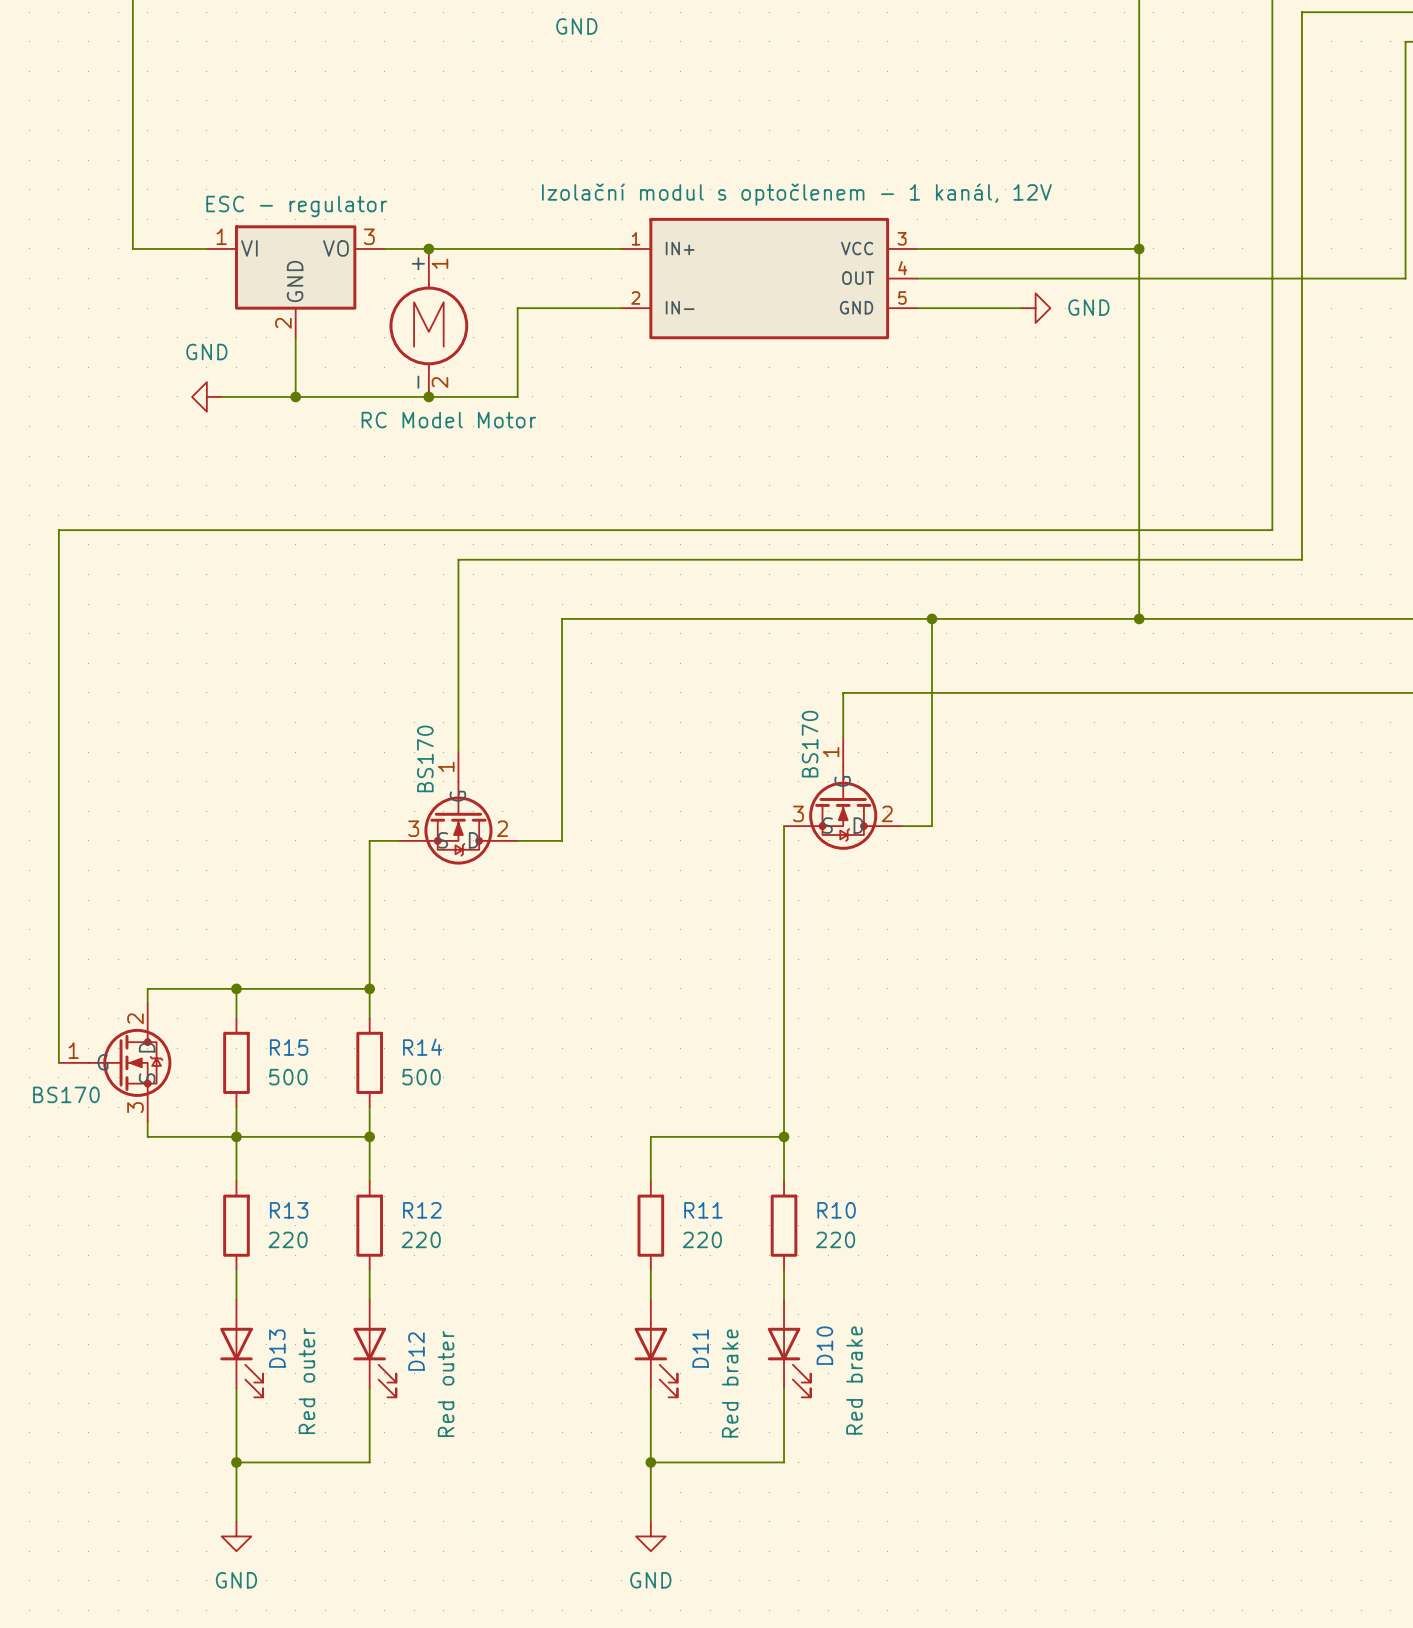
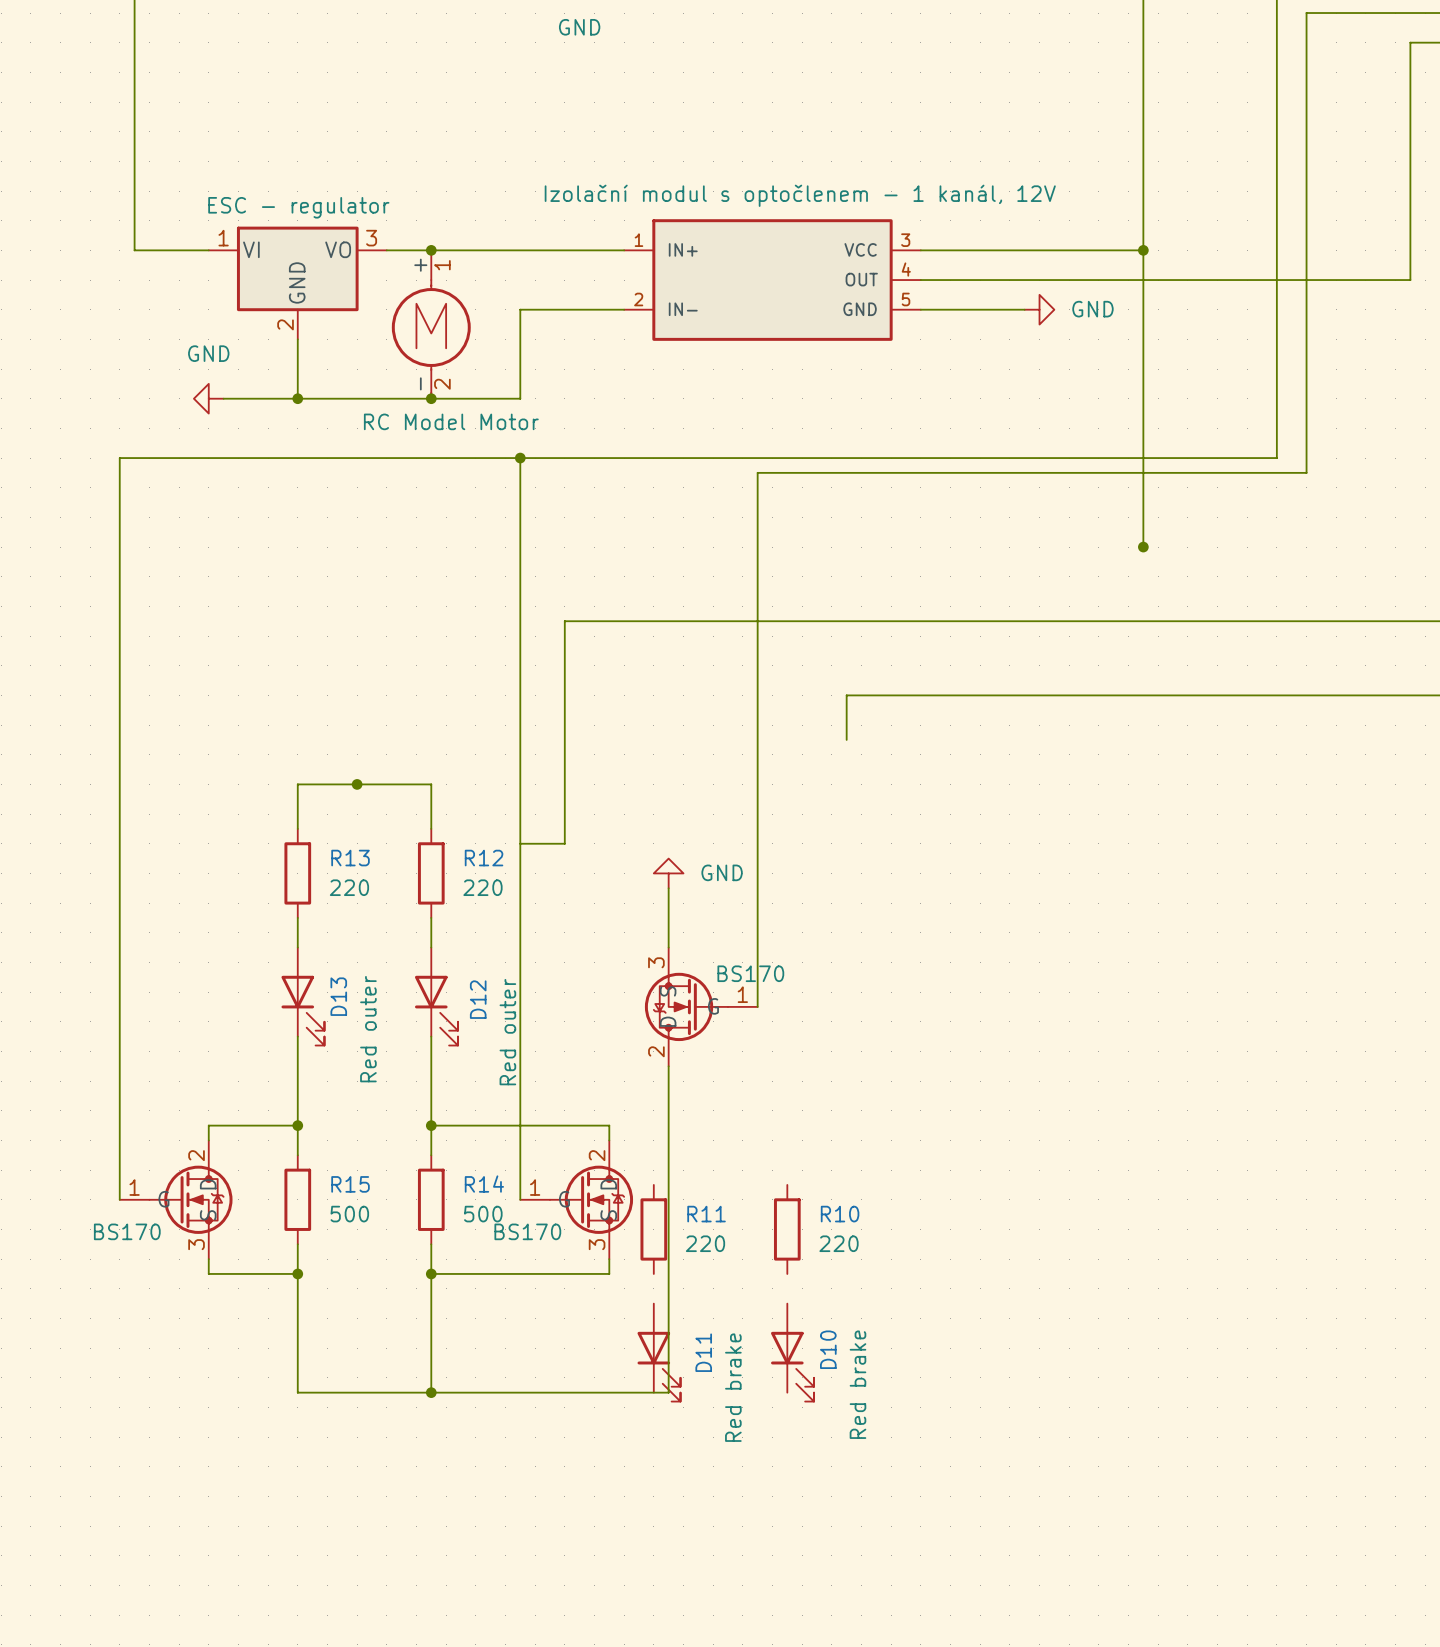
wire: none -> (520, 458) (520, 1199)
junction: none -> (520, 458)
wire: (1272, 456) (1272, 530) (58, 530) (58, 1062) -> (1276, 458) (119, 458) (119, 1199)
wire: (1301, 470) (1301, 559) (458, 559) (458, 752) -> (1306, 472) (757, 472) (757, 1006)
wire: (1139, 544) (1139, 618) -> none
junction: none -> (1143, 547)
wire: (932, 618) (932, 826) (902, 826) -> none
junction: (932, 618) -> none
junction: (1139, 618) -> none
junction: none -> (357, 784)
part: BS170 (843, 793) -> none
part: BS170 (458, 808) -> none
wire: none -> (297, 828) (297, 784) (431, 784) (431, 828)
wire: (784, 826) (784, 1181) -> none
wire: (399, 840) (369, 840) (369, 1018) -> none
power symbol: none -> GND (668, 873)
wire: none -> (668, 888) (668, 947)
wire: none -> (431, 917) (431, 947)
wire: (236, 988) (236, 1018) -> (297, 917) (297, 947)
junction: (236, 988) -> none
wire: (369, 988) (147, 988) (147, 1003) -> none
junction: (369, 988) -> none
part: none -> BS170 (701, 1006)
wire: none -> (297, 1036) (297, 1155)
wire: none -> (431, 1036) (431, 1155)
part position: (115, 1062) -> (176, 1199)
R15 position: (236, 1062) -> (297, 1199)
R14 position: (369, 1062) -> (431, 1199)
wire: none -> (668, 1066) (668, 1392) (297, 1392) (297, 1244)
wire: (236, 1107) (236, 1181) -> none
wire: (369, 1107) (369, 1181) -> none
wire: (147, 1122) (147, 1136) (369, 1136) -> none
wire: none -> (297, 1125) (208, 1125) (208, 1140)
junction: none -> (297, 1125)
wire: none -> (431, 1125) (609, 1125) (609, 1140)
junction: none -> (431, 1125)
junction: (236, 1136) -> none
junction: (369, 1136) -> none
wire: (784, 1136) (650, 1136) (650, 1181) -> none
junction: (784, 1136) -> none
part: none -> BS170 (576, 1199)
R13 position: (236, 1225) -> (297, 873)
R12 position: (369, 1225) -> (431, 873)
wire: none -> (431, 1244) (431, 1392)
wire: none -> (208, 1259) (208, 1273) (297, 1273)
wire: none -> (609, 1259) (609, 1273) (431, 1273)
wire: (236, 1270) (236, 1299) -> none
junction: none -> (297, 1273)
wire: (369, 1270) (369, 1299) -> none
junction: none -> (431, 1273)
wire: (650, 1270) (650, 1299) -> none
wire: (784, 1270) (784, 1299) -> none
D13 position: (241, 1348) -> (302, 996)
D12 position: (374, 1348) -> (436, 996)
wire: (236, 1388) (236, 1521) -> none
wire: (369, 1388) (369, 1462) (236, 1462) -> none
junction: none -> (431, 1392)
wire: (650, 1388) (650, 1521) -> none
wire: (784, 1388) (784, 1462) (650, 1462) -> none
junction: (236, 1462) -> none
junction: (650, 1462) -> none
power symbol: GND (236, 1536) -> none
power symbol: GND (650, 1536) -> none

